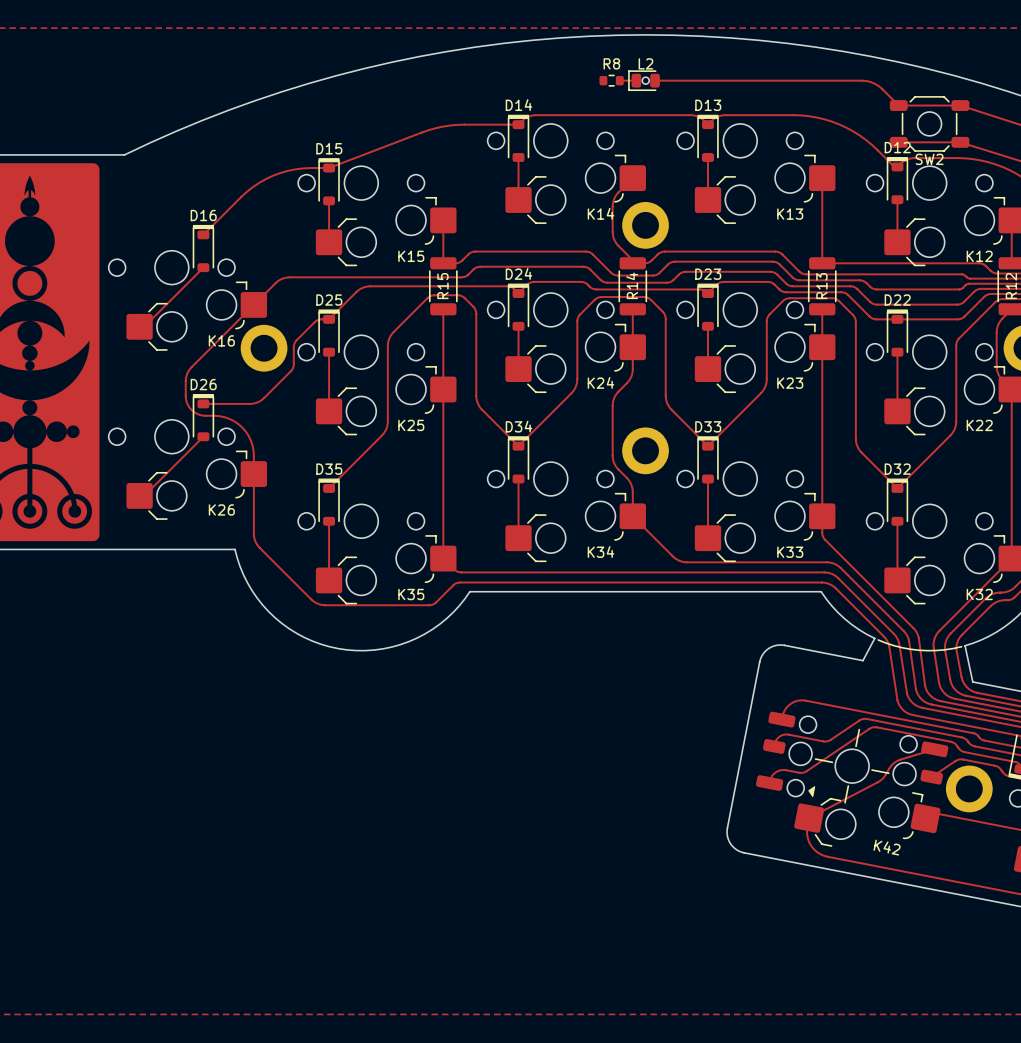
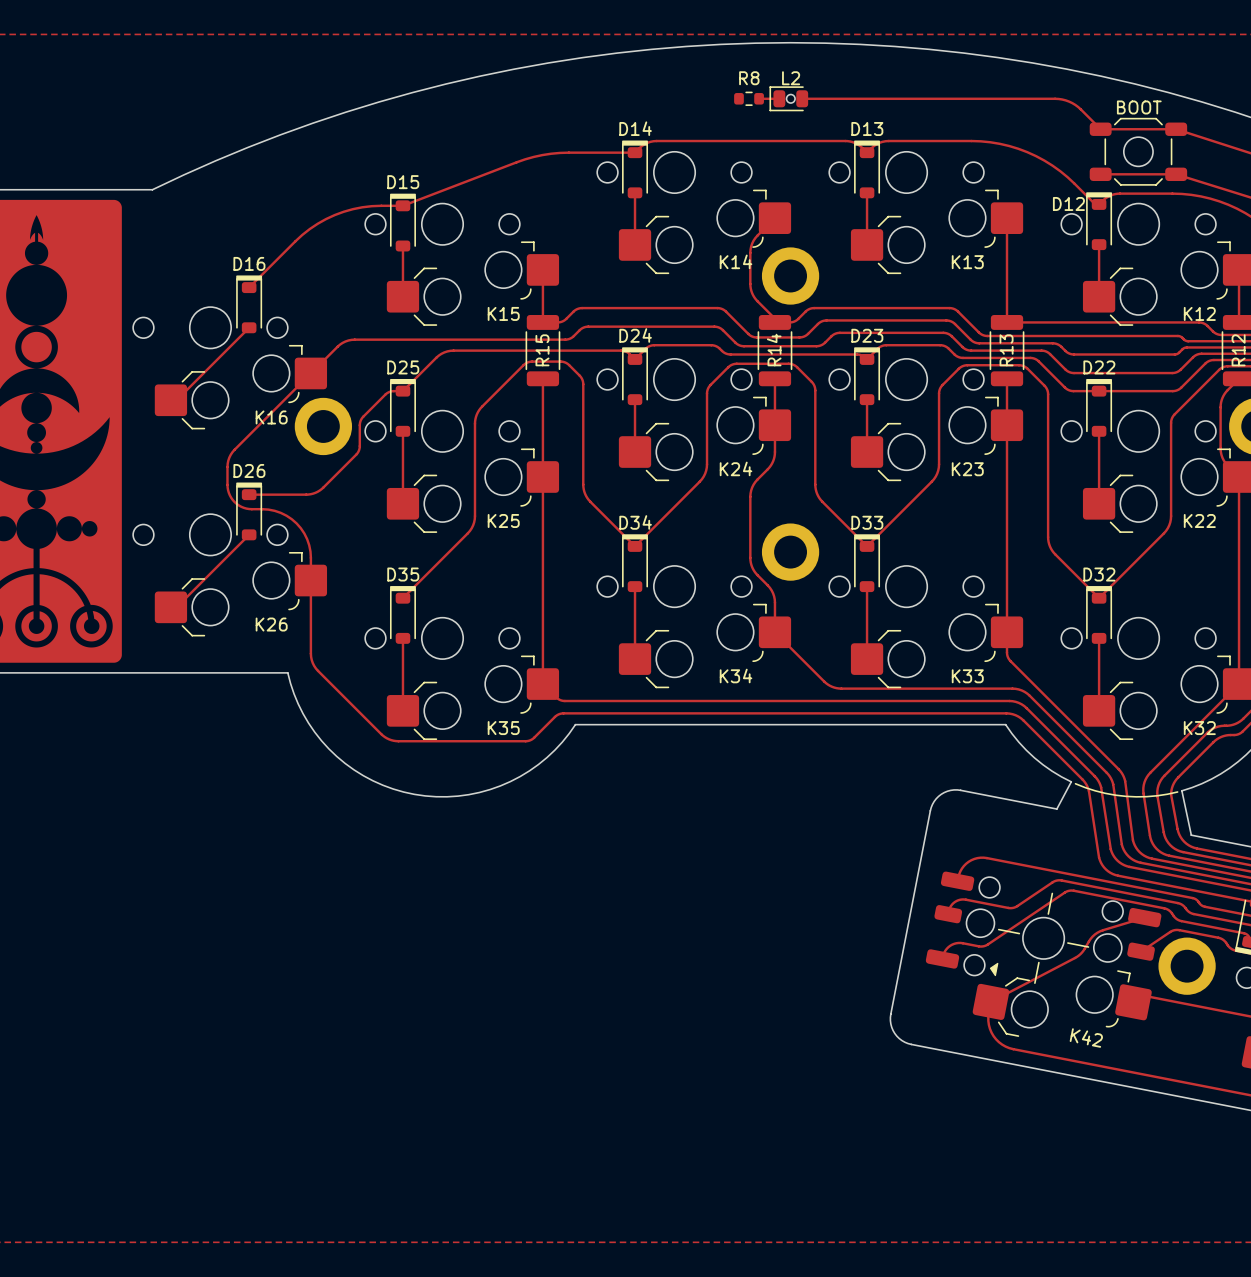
SW2 value: none -> BOOT (1139, 107)
D12 name position: D12 (897, 147) -> D12 (1068, 203)
SW2 name: SW2 (929, 159) -> none

